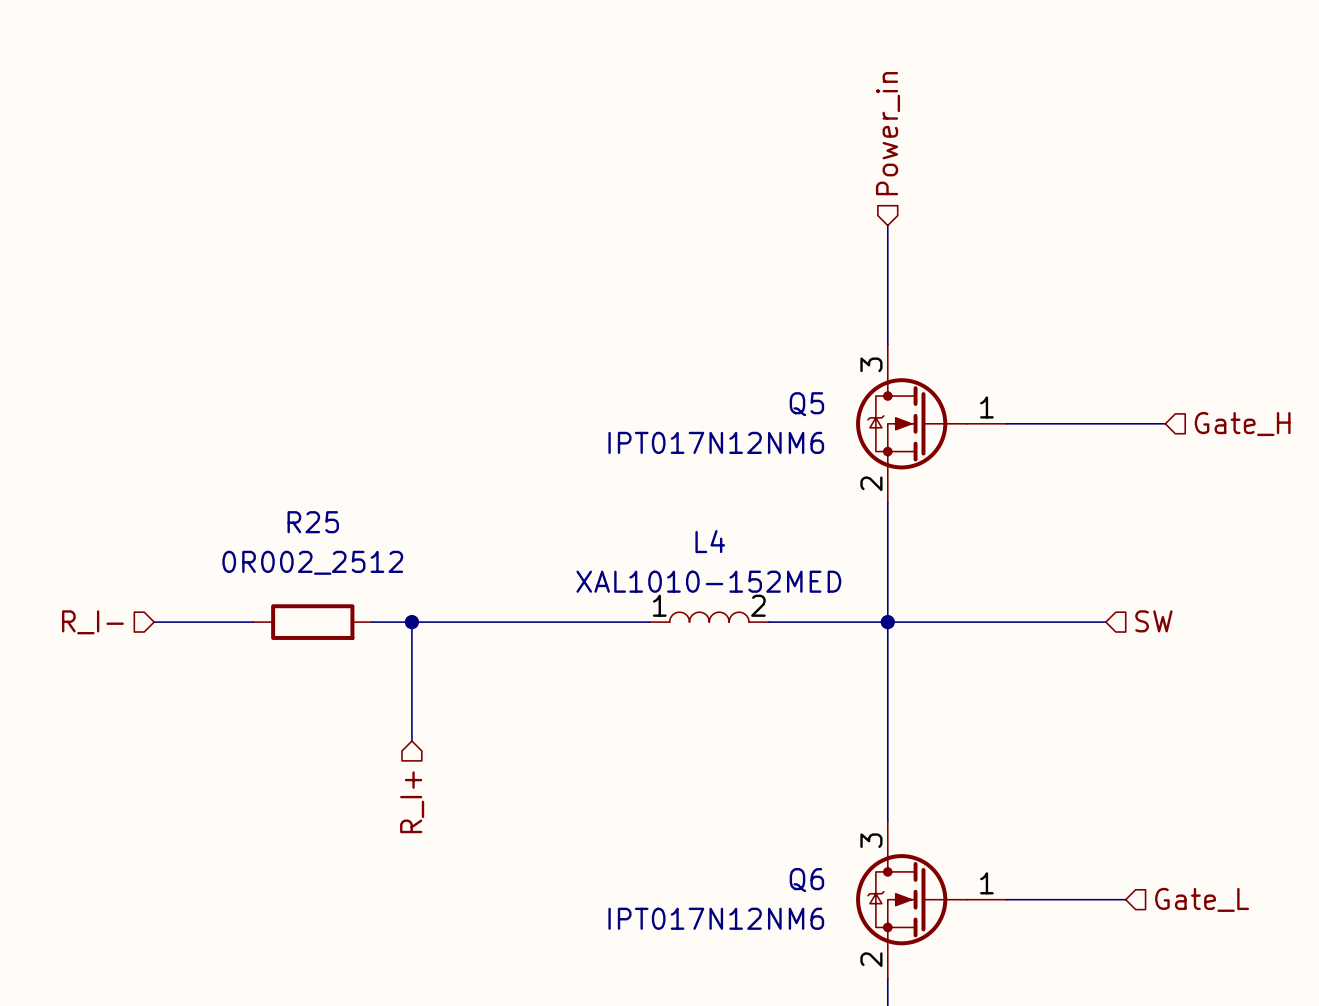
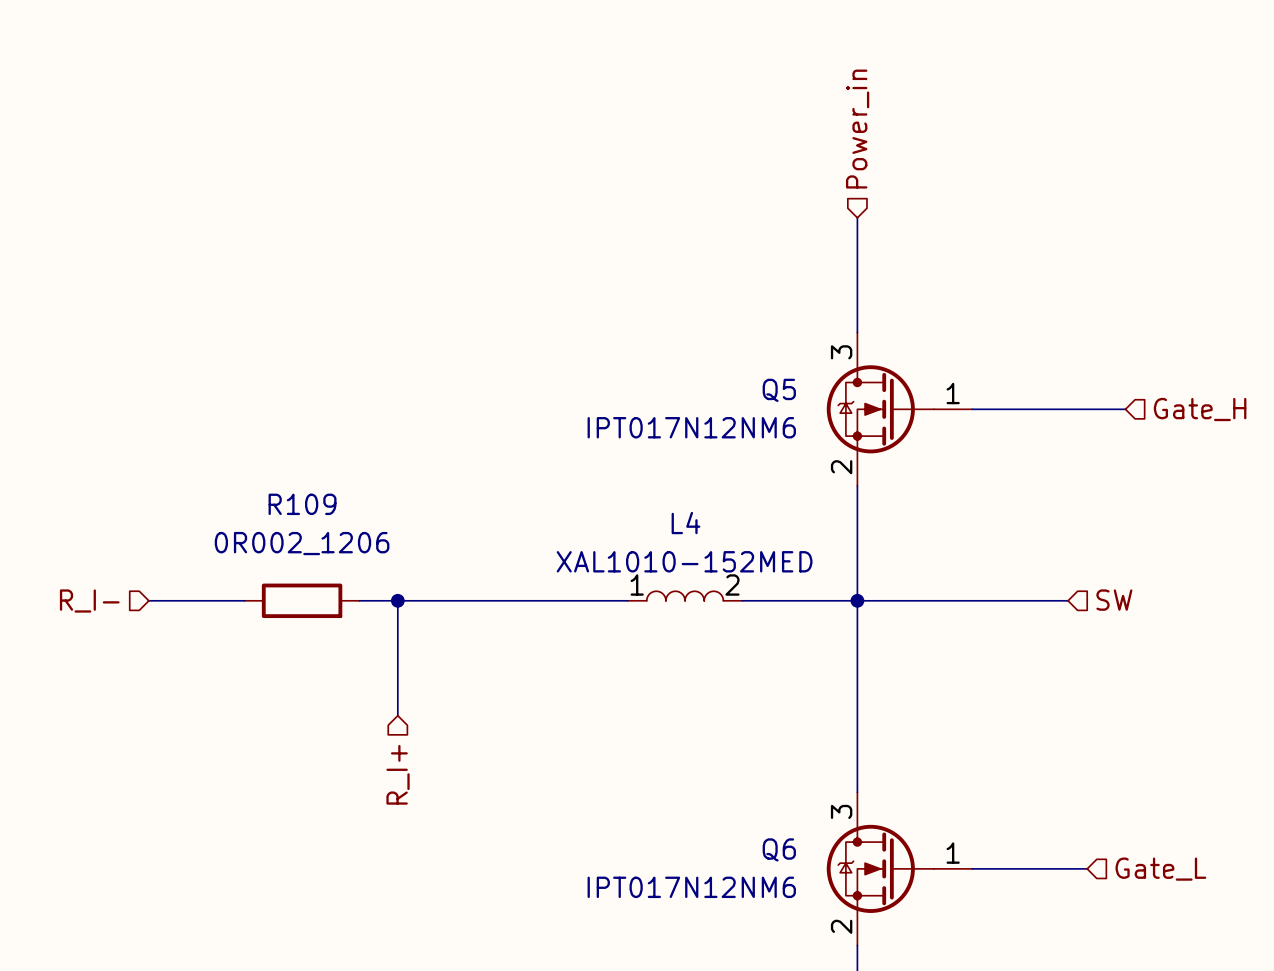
R25 name: R25 (313, 522) -> R109 (302, 504)
R25 value: 0R002_2512 (312, 562) -> 0R002_1206 (302, 543)

